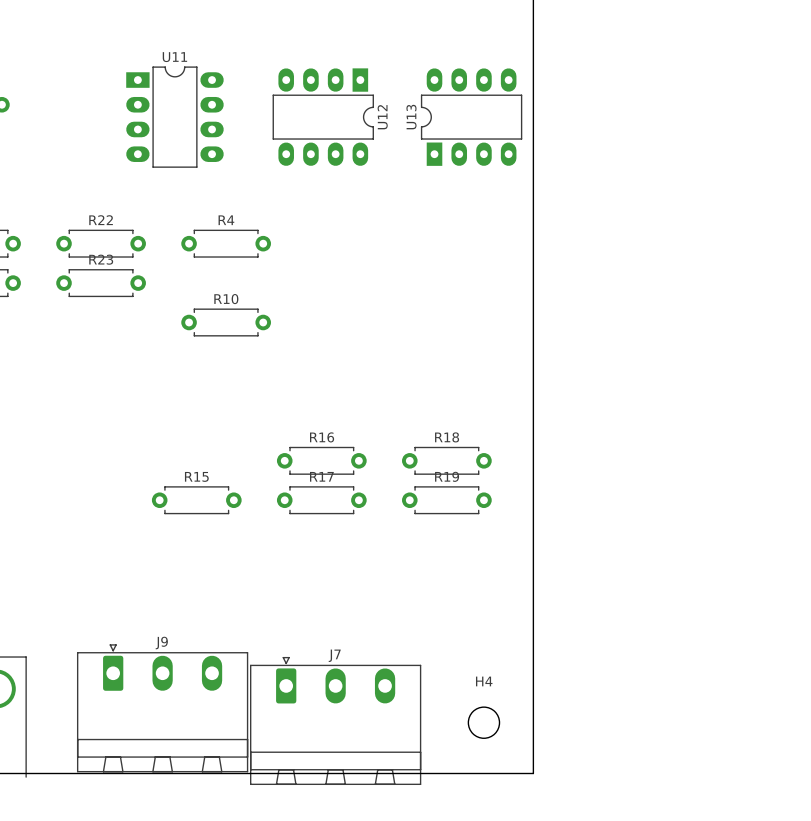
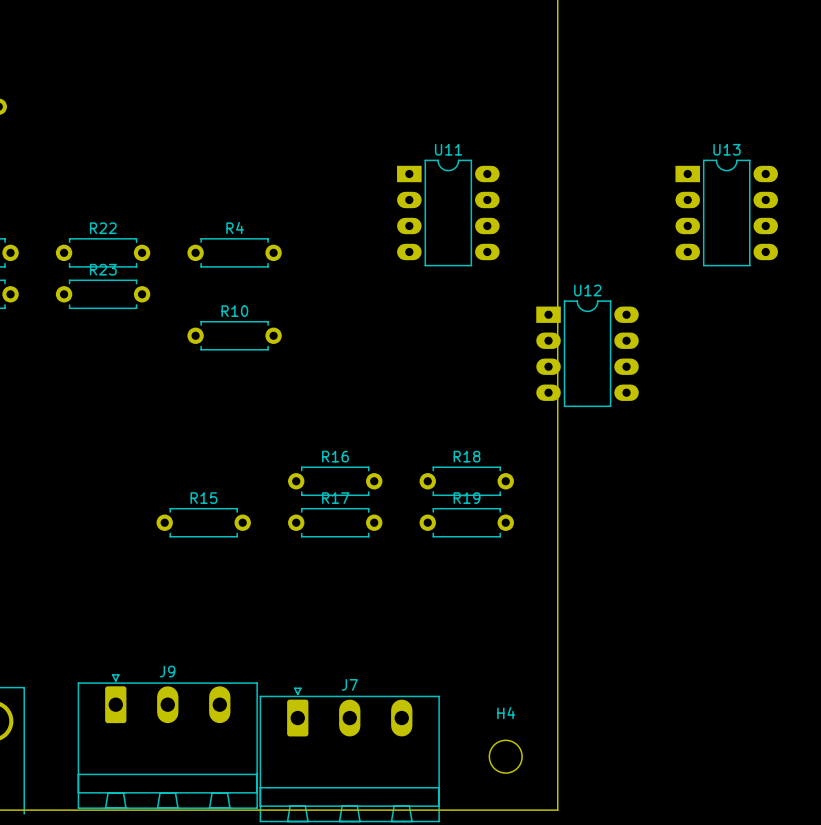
U11 position: (174, 117) -> (448, 212)
U12 rotation: 0° (323, 117) -> 90° counterclockwise (587, 353)
U12 position: (323, 117) -> (587, 353)
U13 rotation: 0° (471, 117) -> 90° clockwise (726, 212)
U13 position: (471, 117) -> (726, 212)

